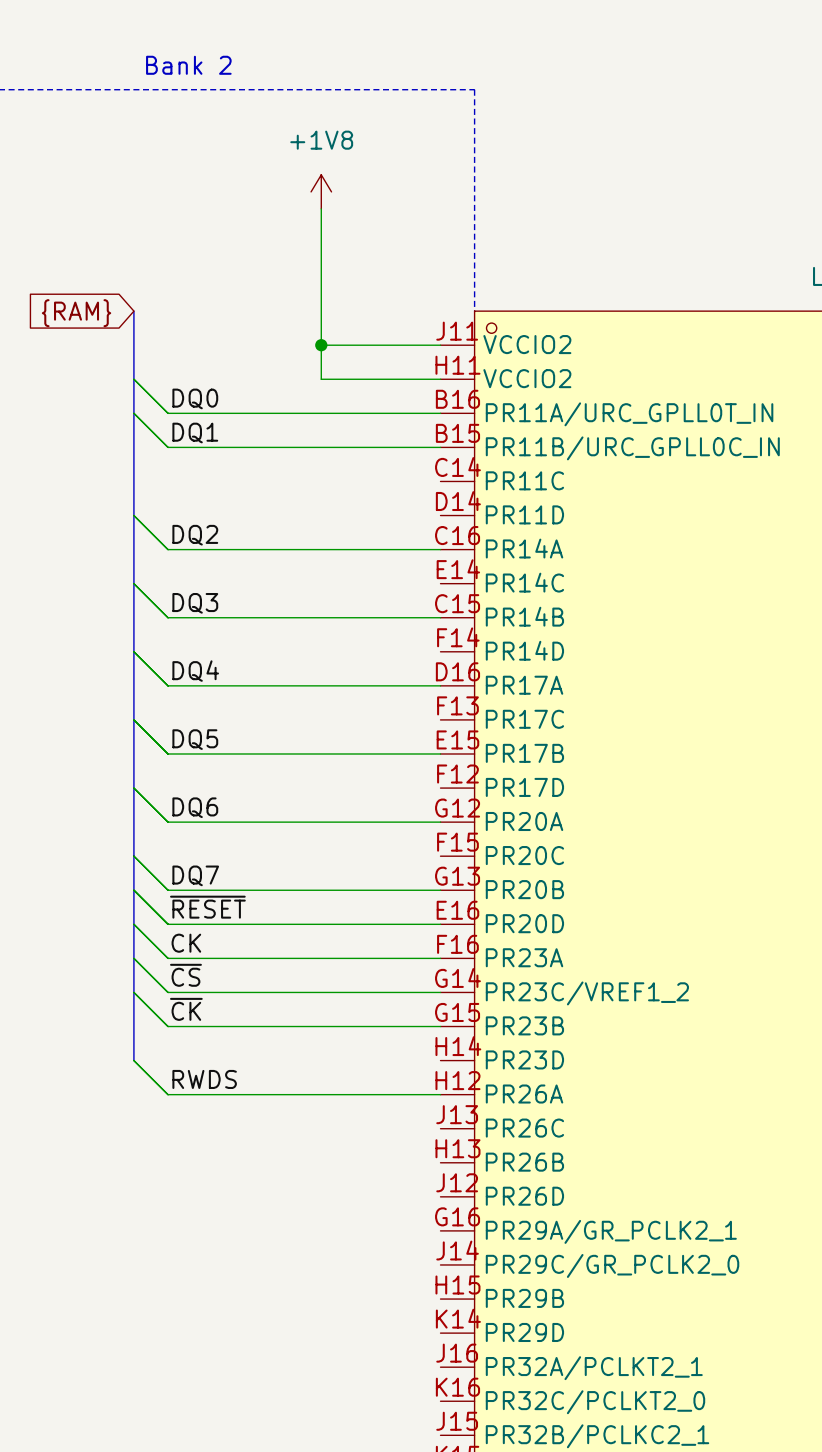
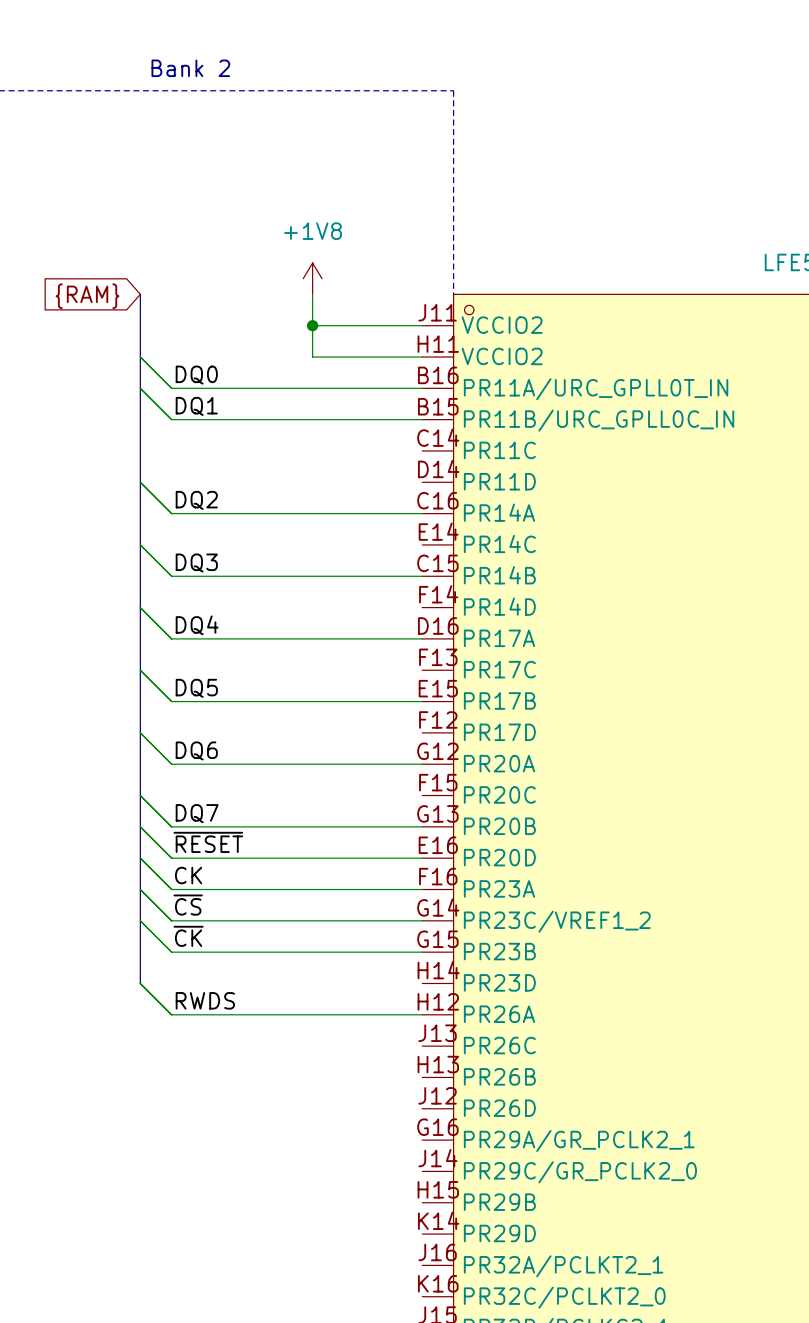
power symbol position: +1V8 (321, 191) -> +1V8 (312, 278)
wire: (321, 208) (321, 311) -> none

